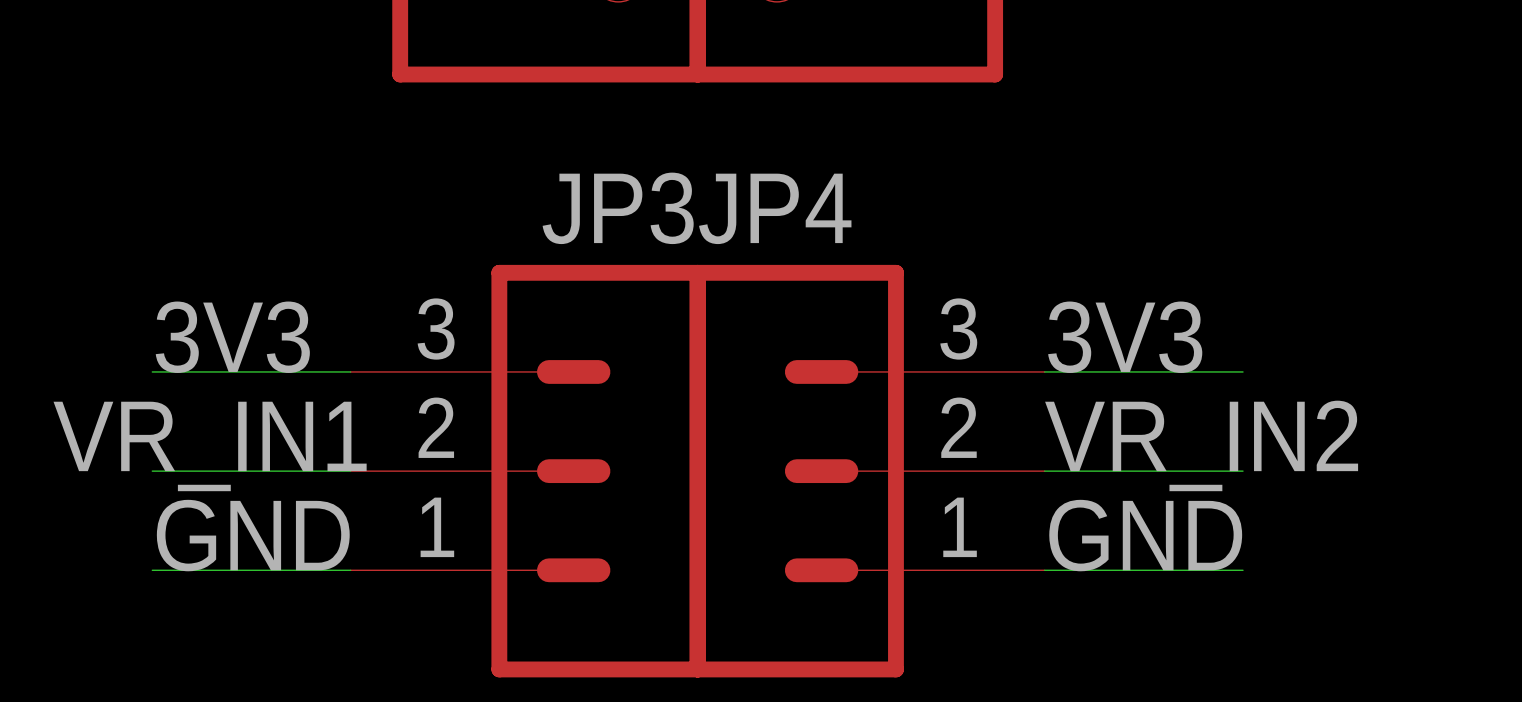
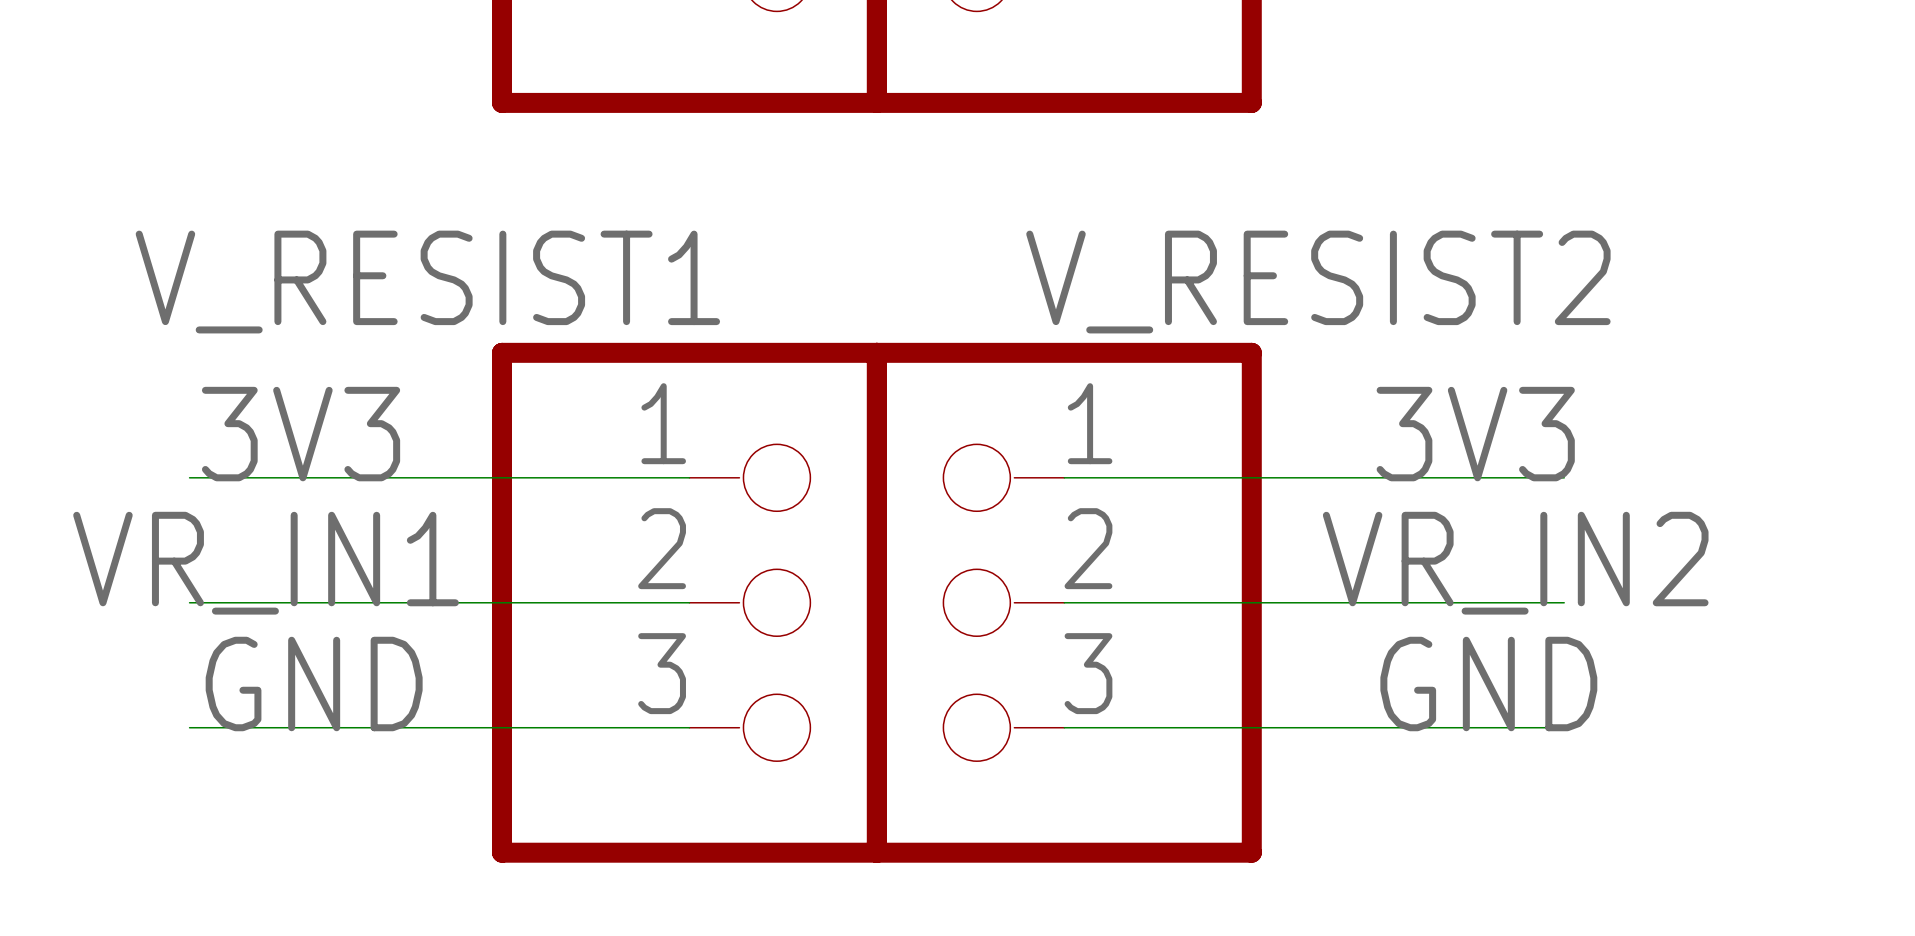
label position: 3V3 (1125, 337) -> 3V3 (1475, 434)
JP3: (528, 471) -> none
V_RESIST1: none -> (689, 602)
V_RESIST2: none -> (1064, 602)
JP4: (867, 471) -> none
label position: GND (1145, 535) -> GND (1488, 684)

